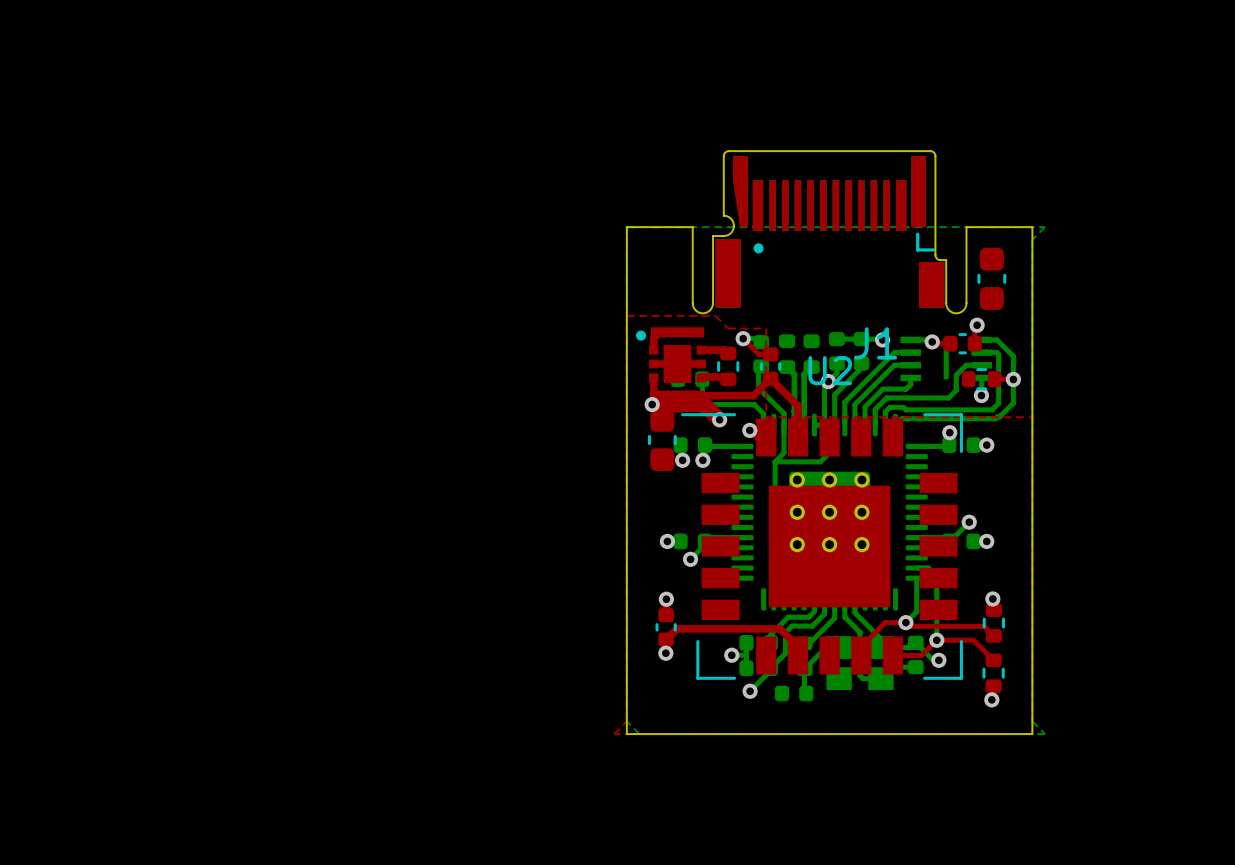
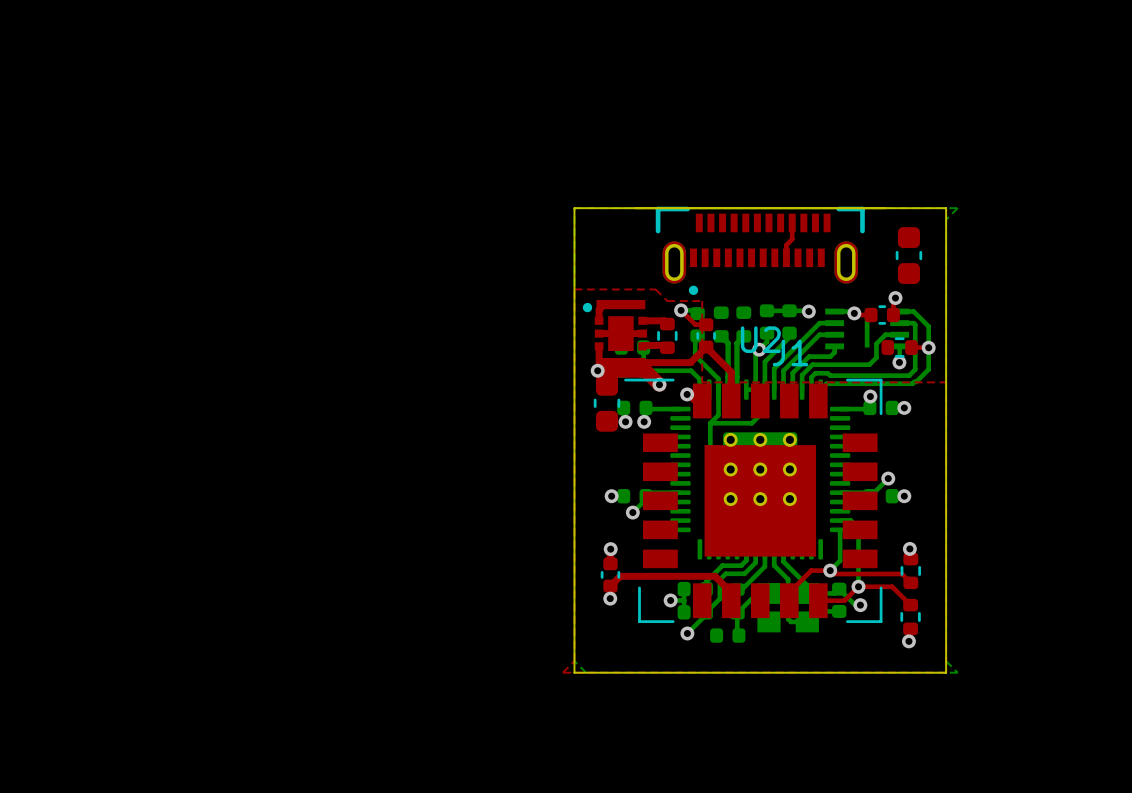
J1 footprint: [712, 150, 947, 308] -> [655, 206, 865, 295]
board edge: (692, 227) (693, 305) (696, 311) (704, 313) (710, 309) (713, 303) -> (634, 208) (885, 208)
board edge: (966, 227) (966, 305) (962, 311) (955, 313) (948, 309) (946, 303) -> none
top track: none -> (792, 222) (792, 239) (786, 245) (786, 257)

